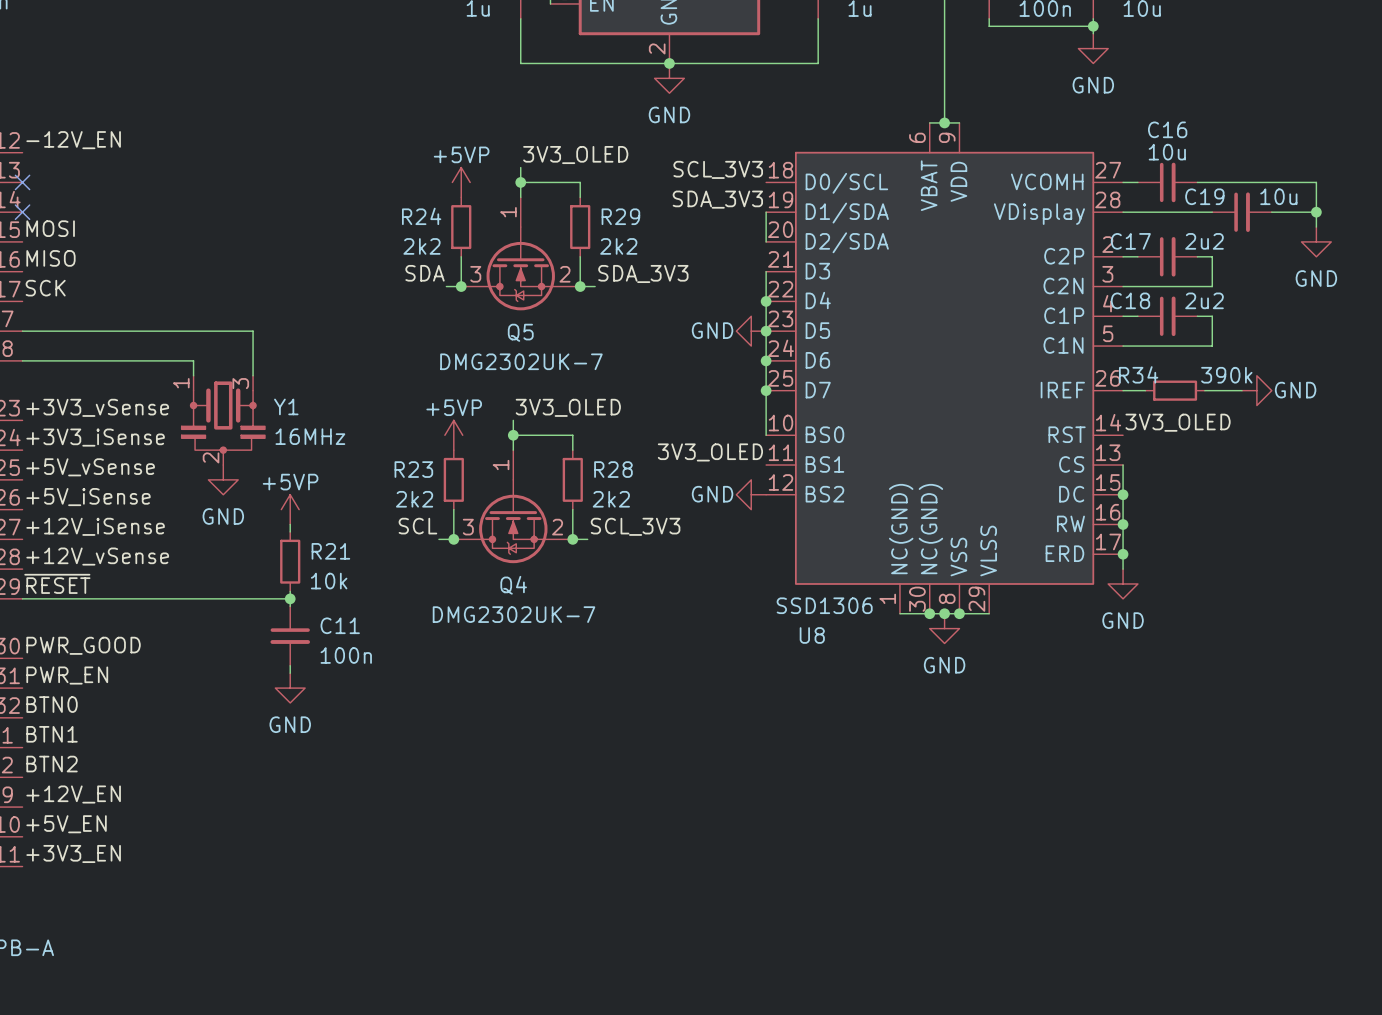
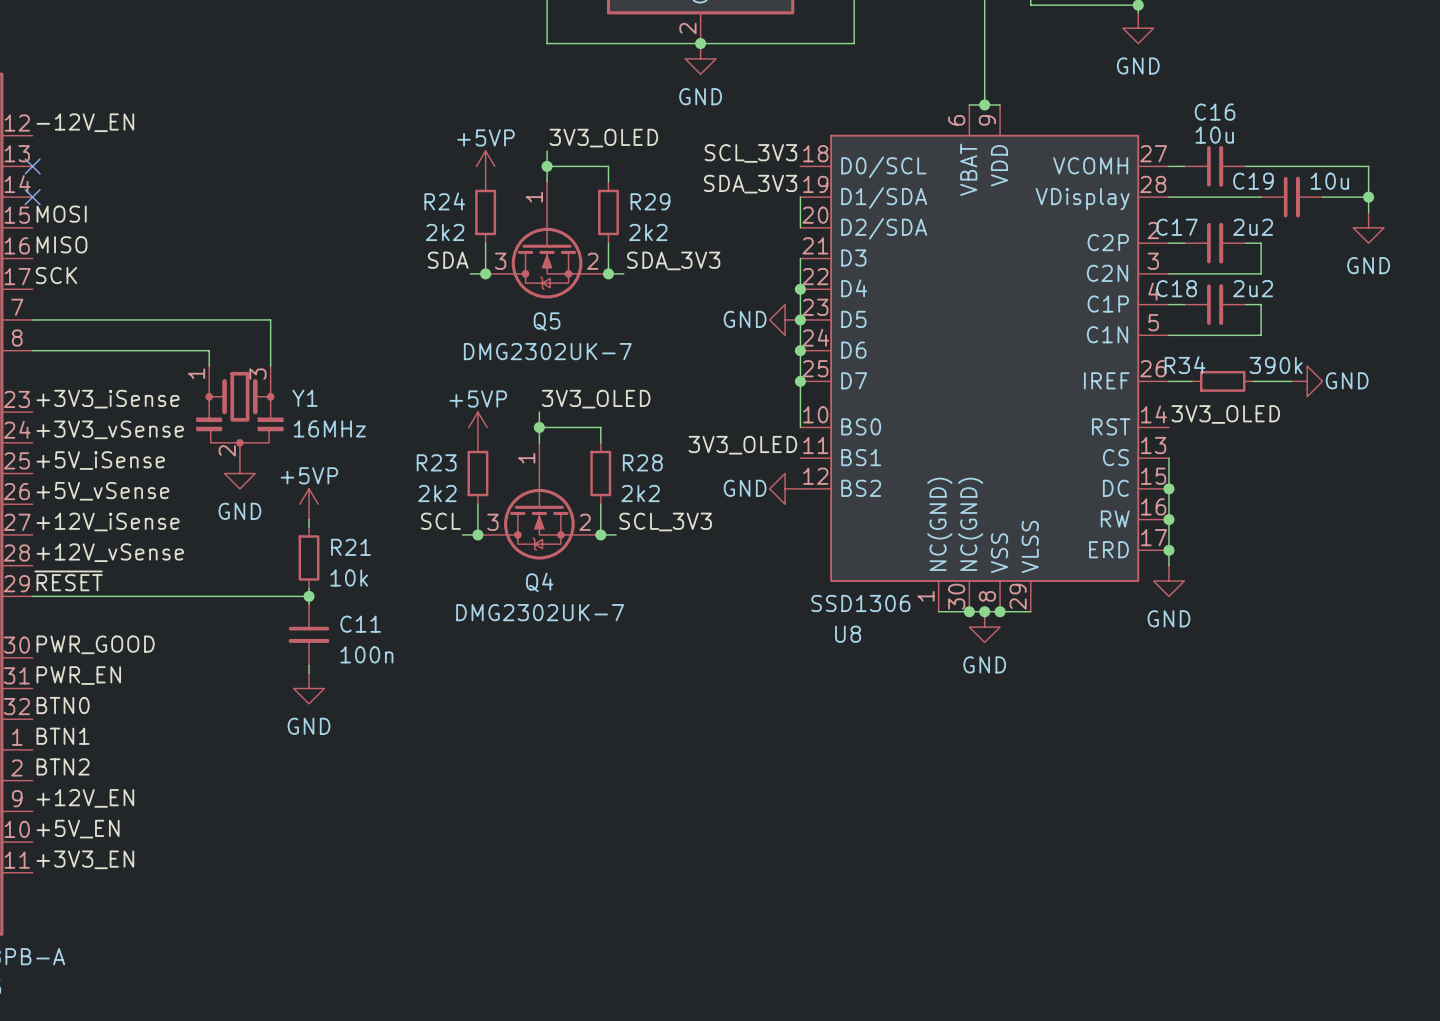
label: +3V3_vSense (97, 407) -> +3V3_iSense (108, 399)
label: +3V3_iSense (95, 437) -> +3V3_vSense (110, 429)
label: +5V_vSense (90, 467) -> +5V_iSense (100, 460)
label: +5V_iSense (88, 497) -> +5V_vSense (102, 491)

